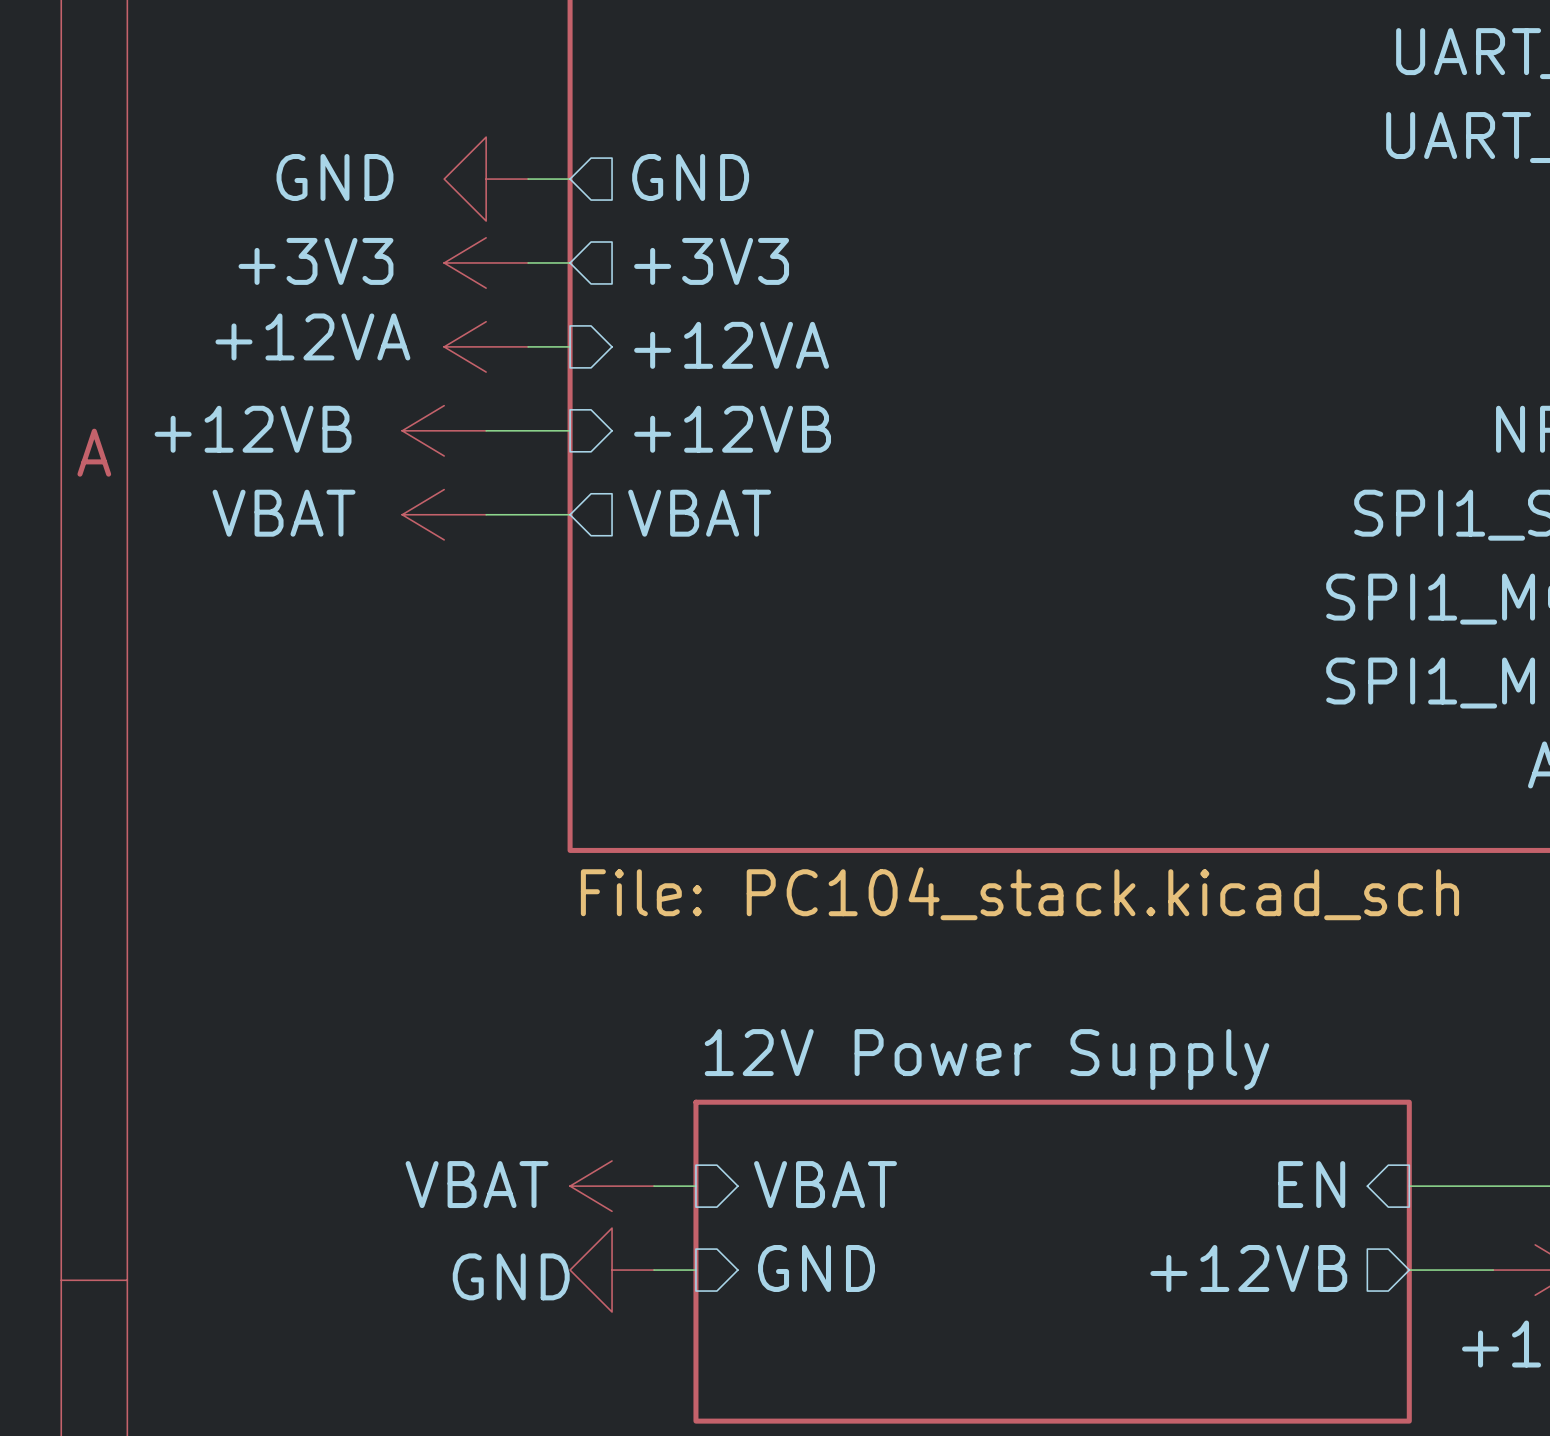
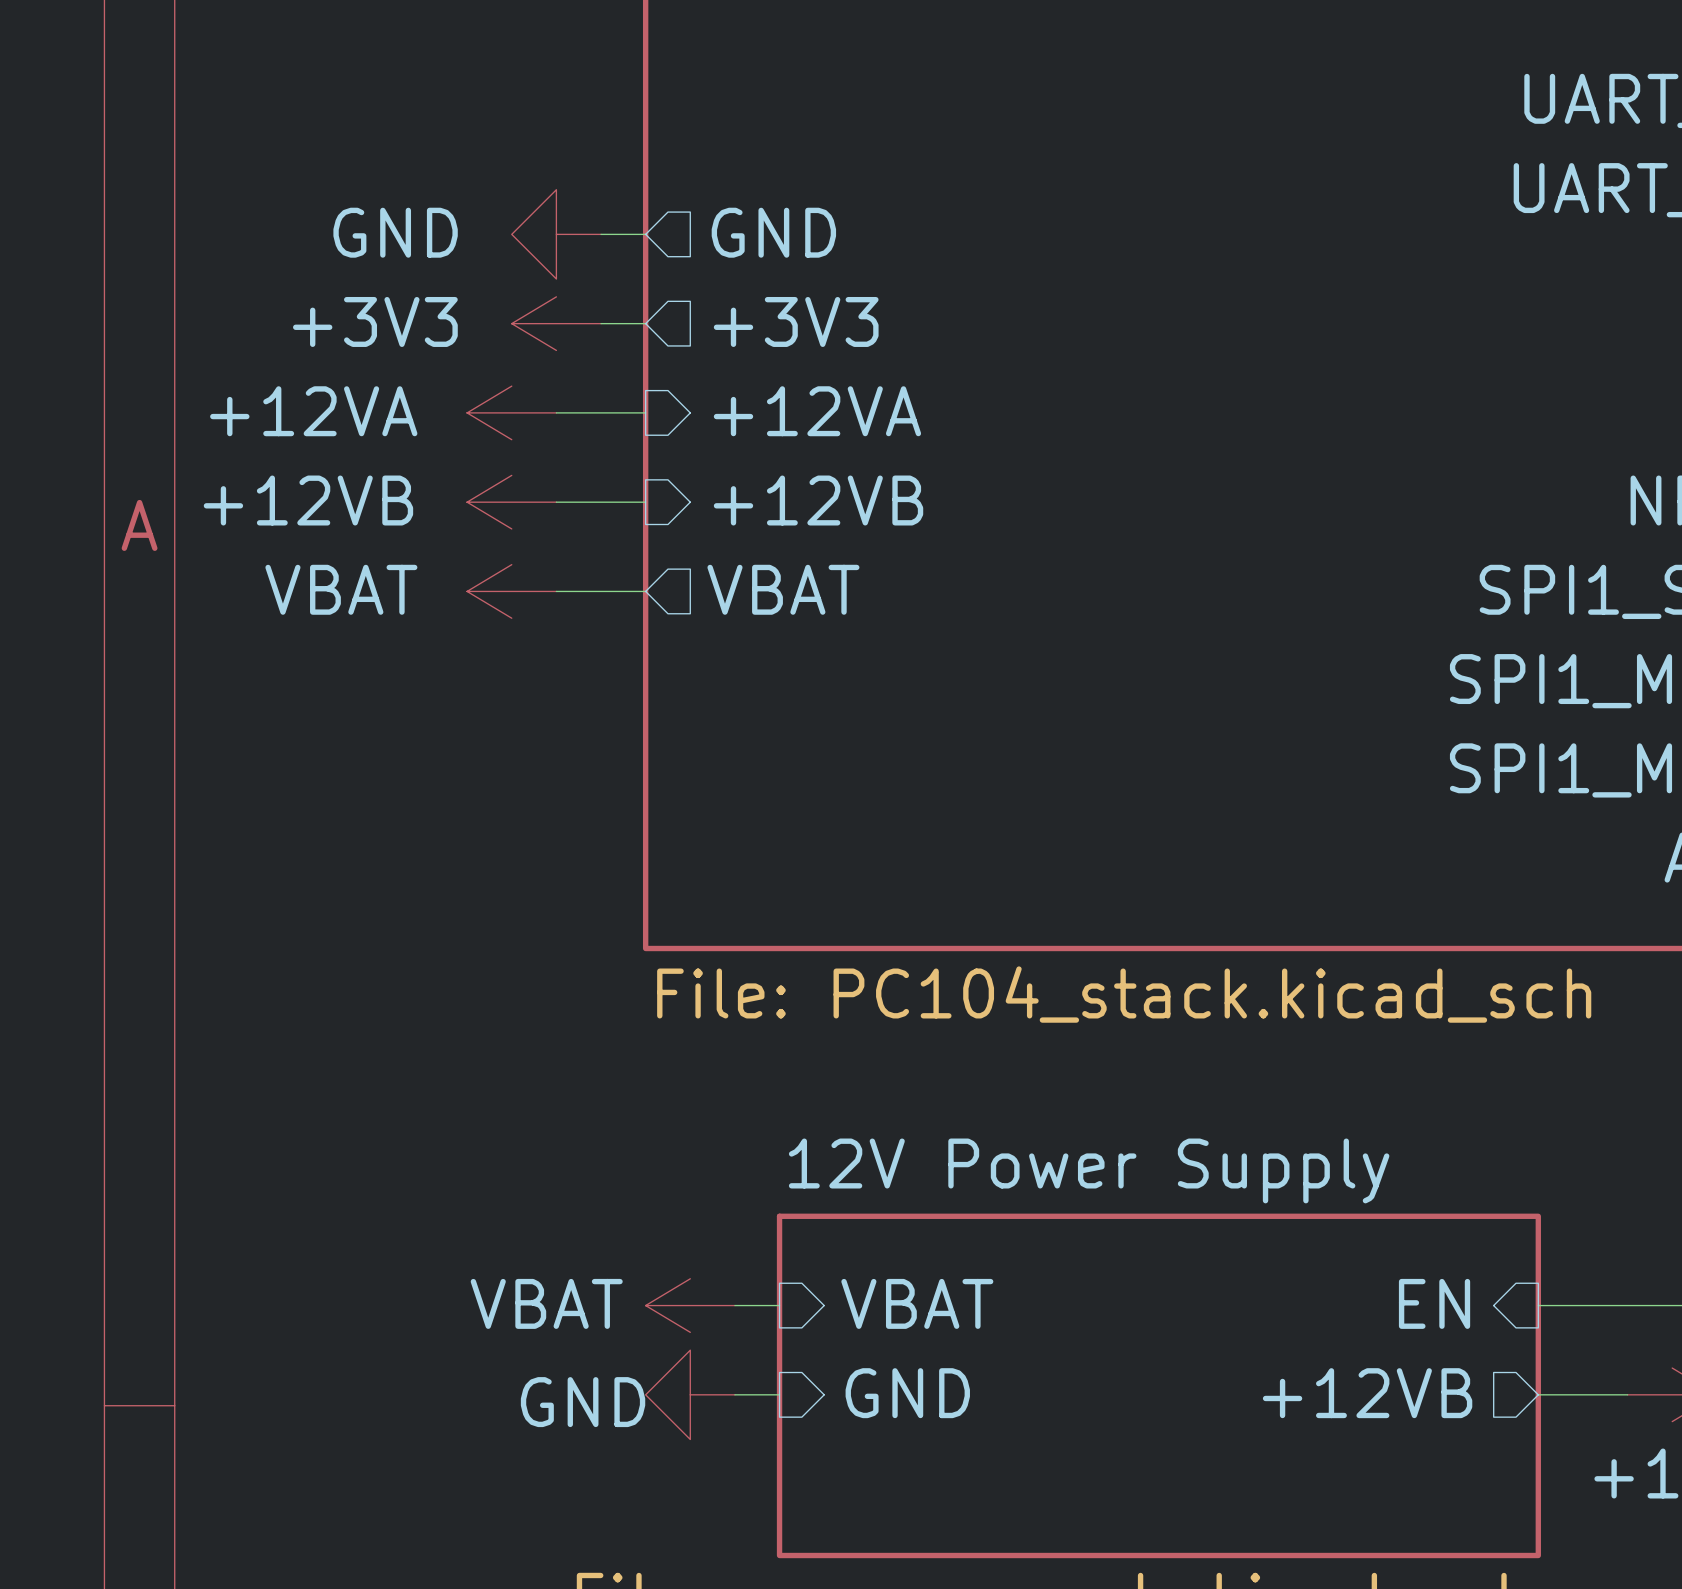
power symbol text position: +12VA (312, 336) -> +12VA (313, 411)
power symbol position: +12VA (486, 346) -> +12VA (511, 412)

